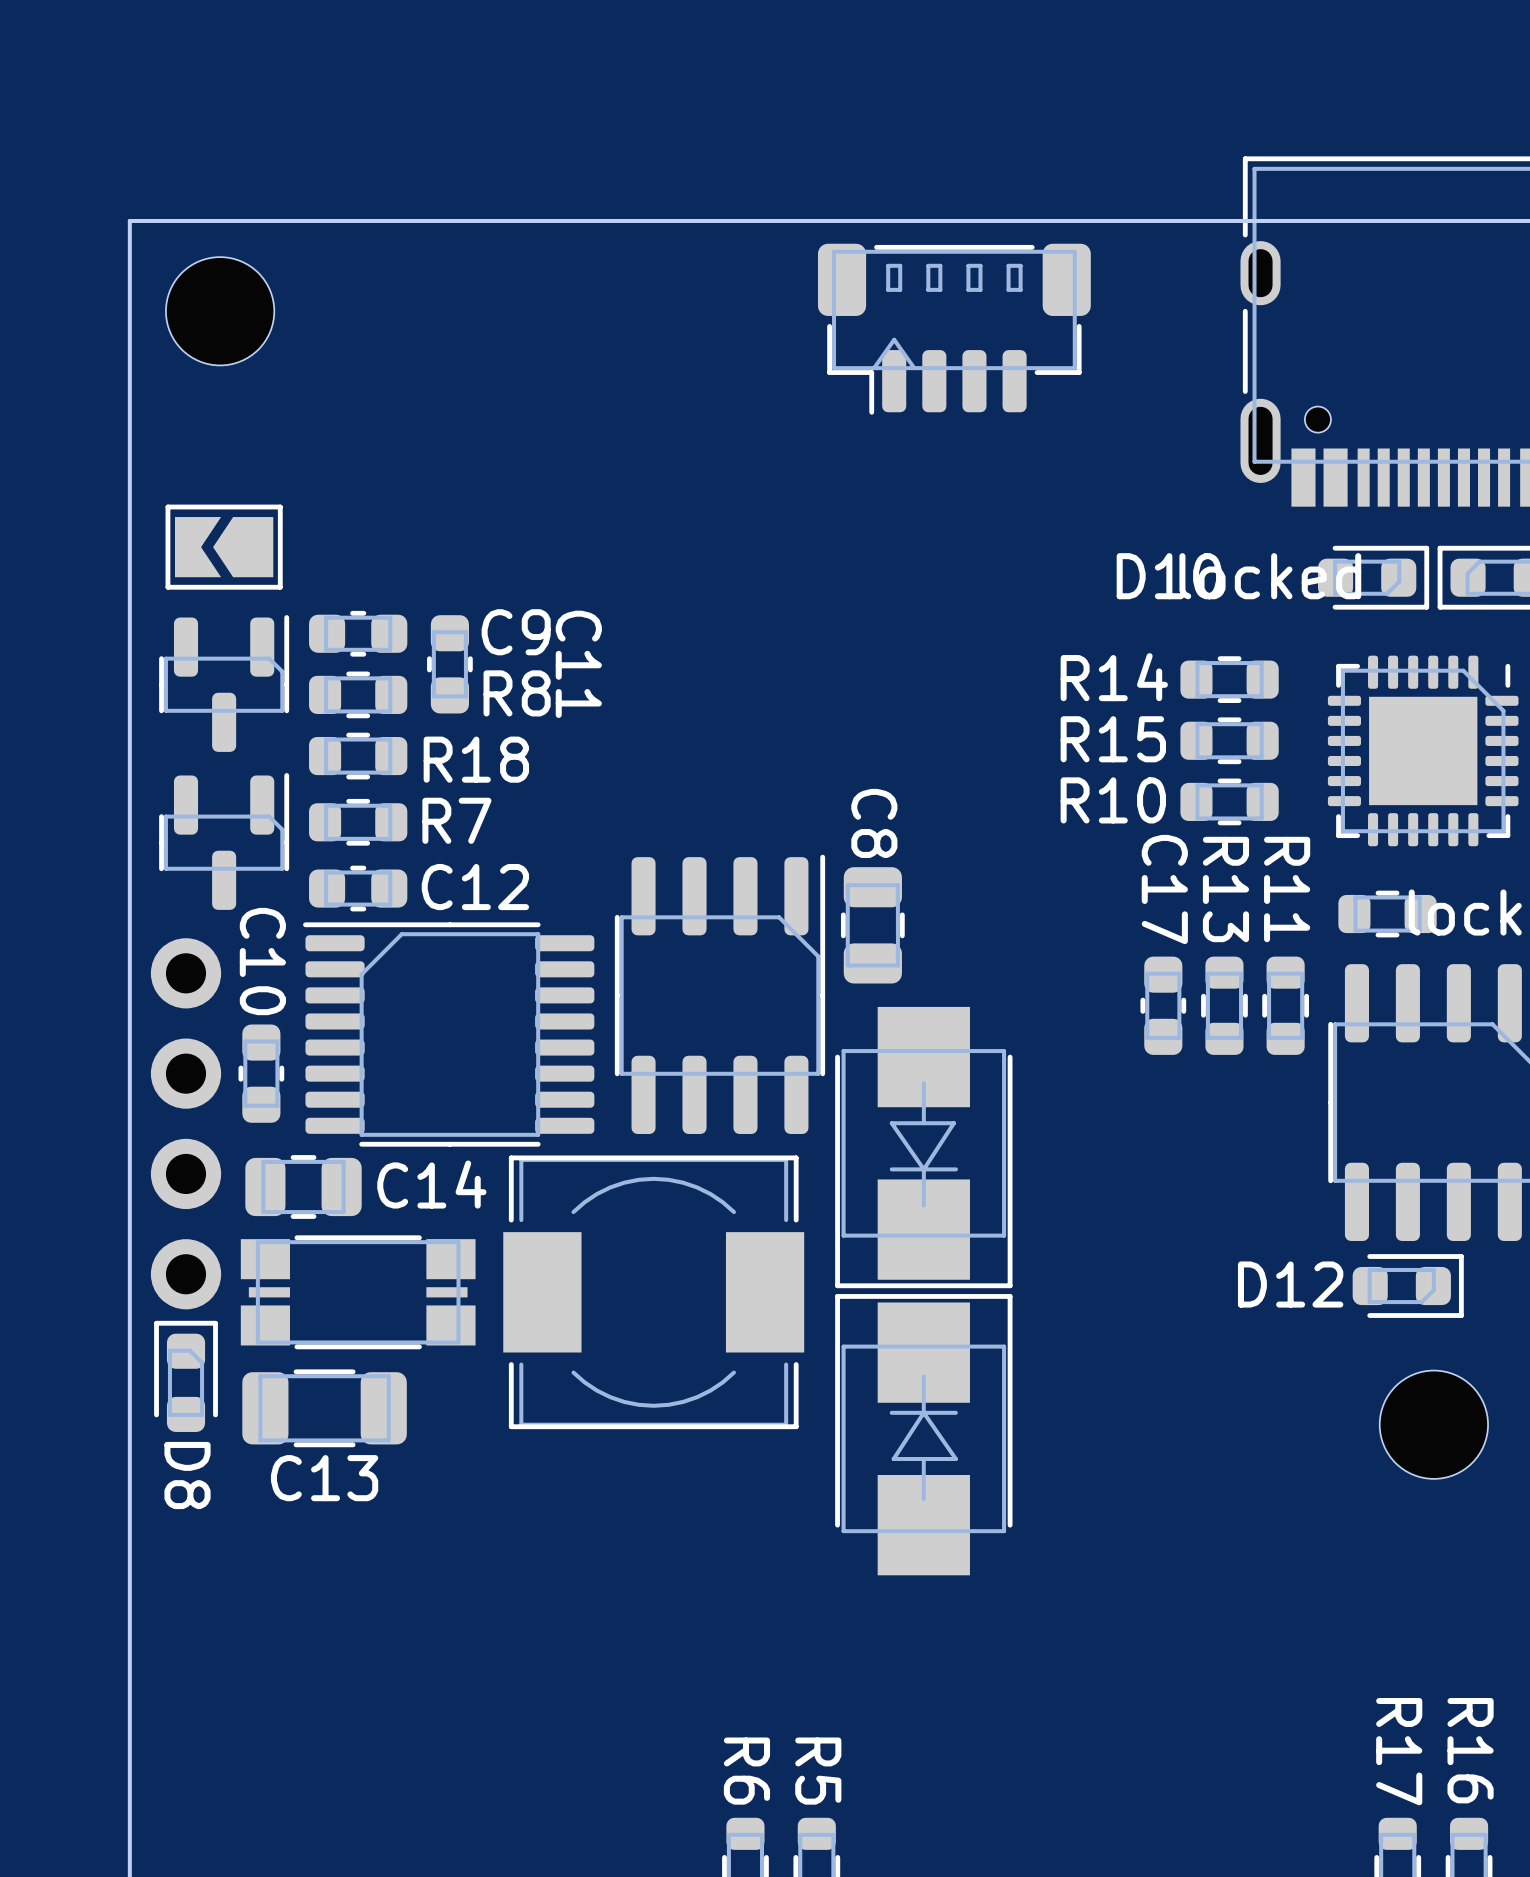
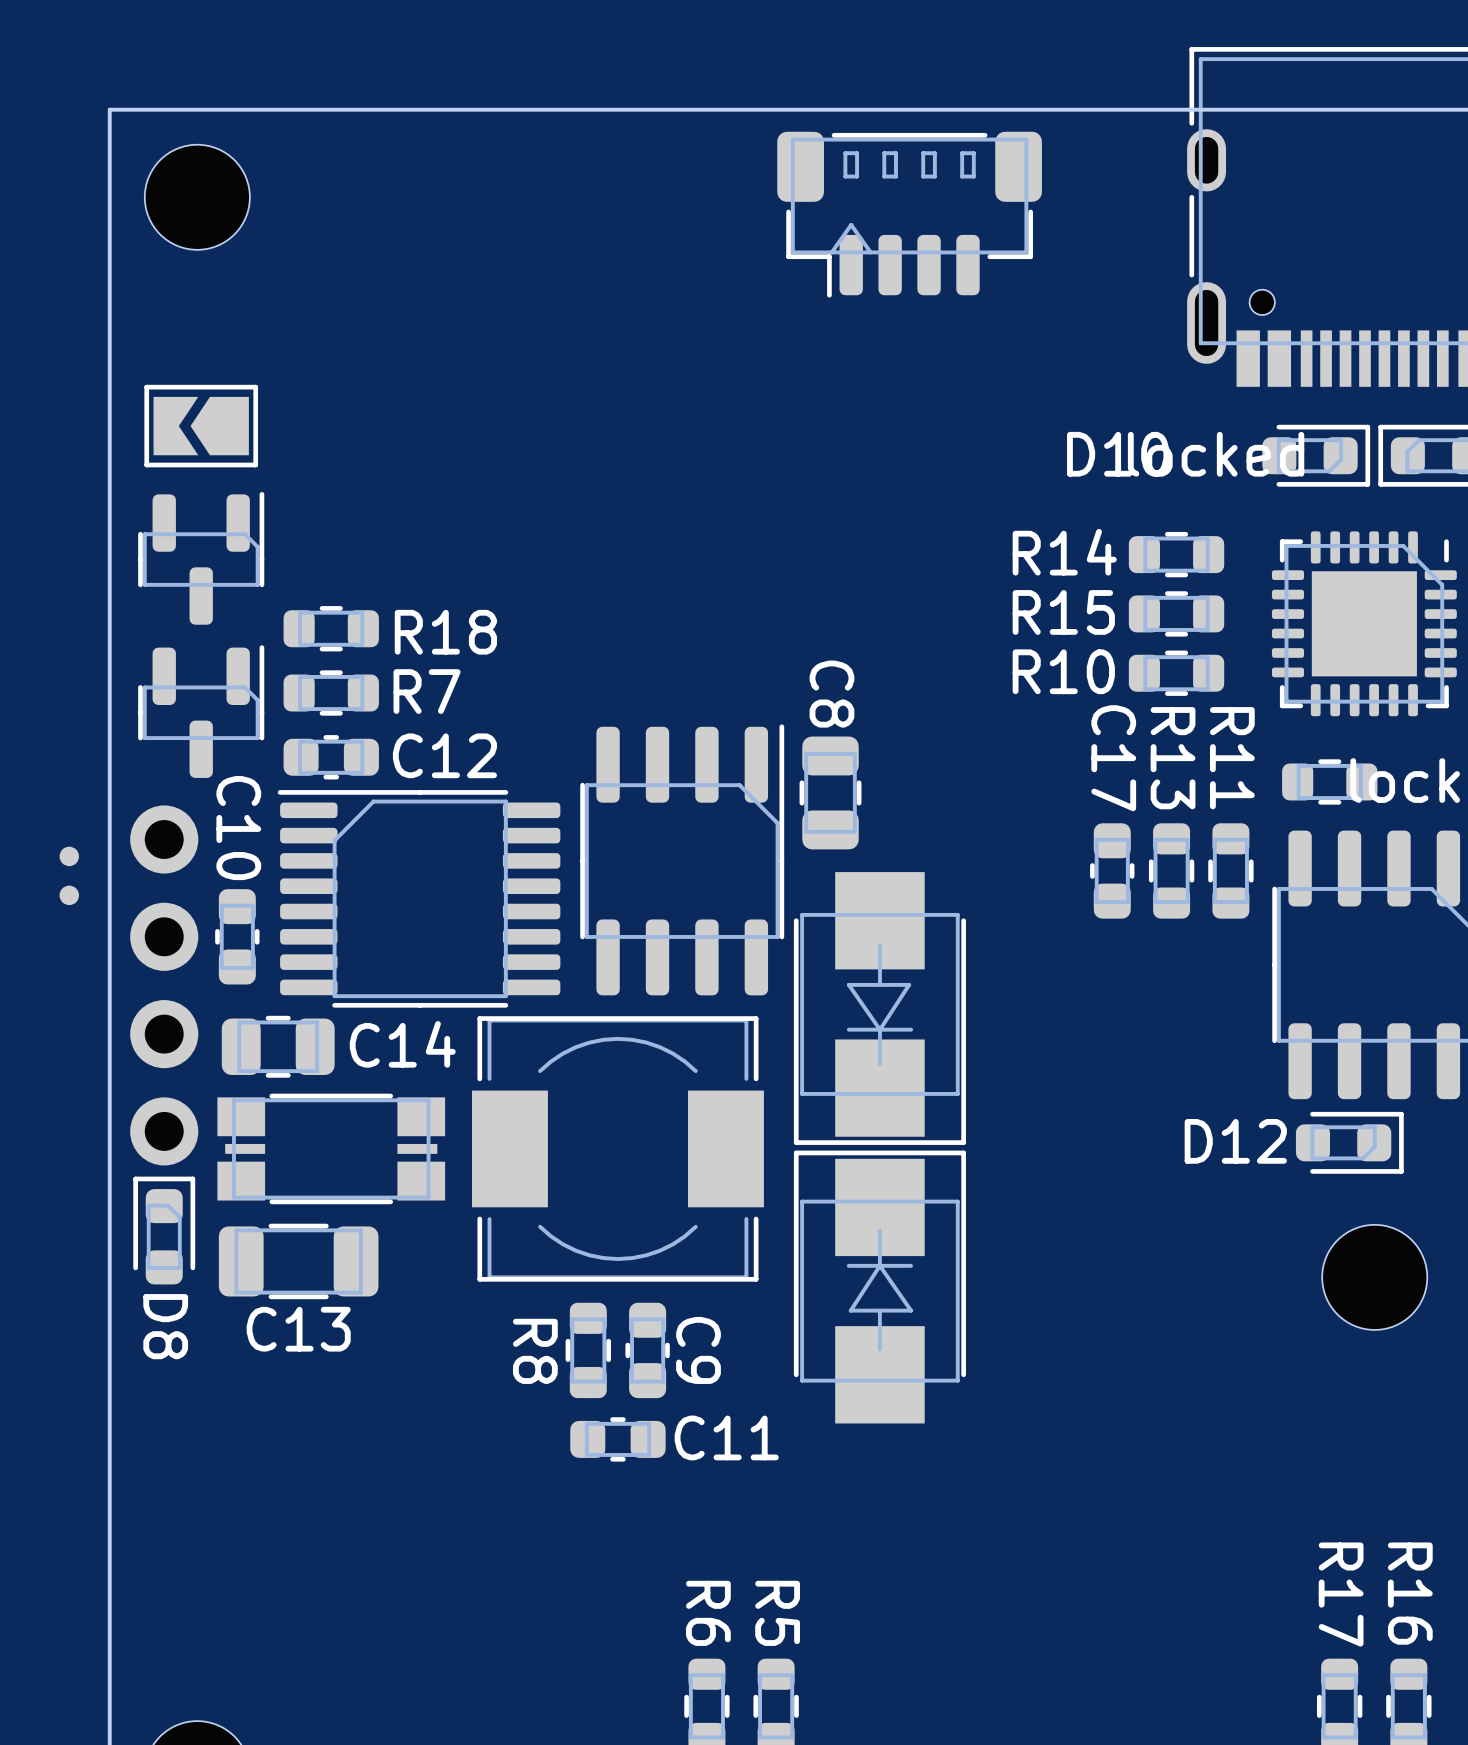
C9 name position: C9 (516, 632) -> C9 (698, 1350)
C9 rotation: 0° (358, 633) -> 90° clockwise (647, 1350)
C9 position: (358, 633) -> (647, 1350)
C11 rotation: 0° (449, 664) -> 90° clockwise (617, 1439)
C11 position: (449, 664) -> (617, 1439)
R8 name position: R8 (517, 693) -> R8 (535, 1351)
R8 rotation: 0° (358, 694) -> 90° clockwise (588, 1350)
R8 position: (358, 694) -> (588, 1350)
part: none -> (69, 875)

